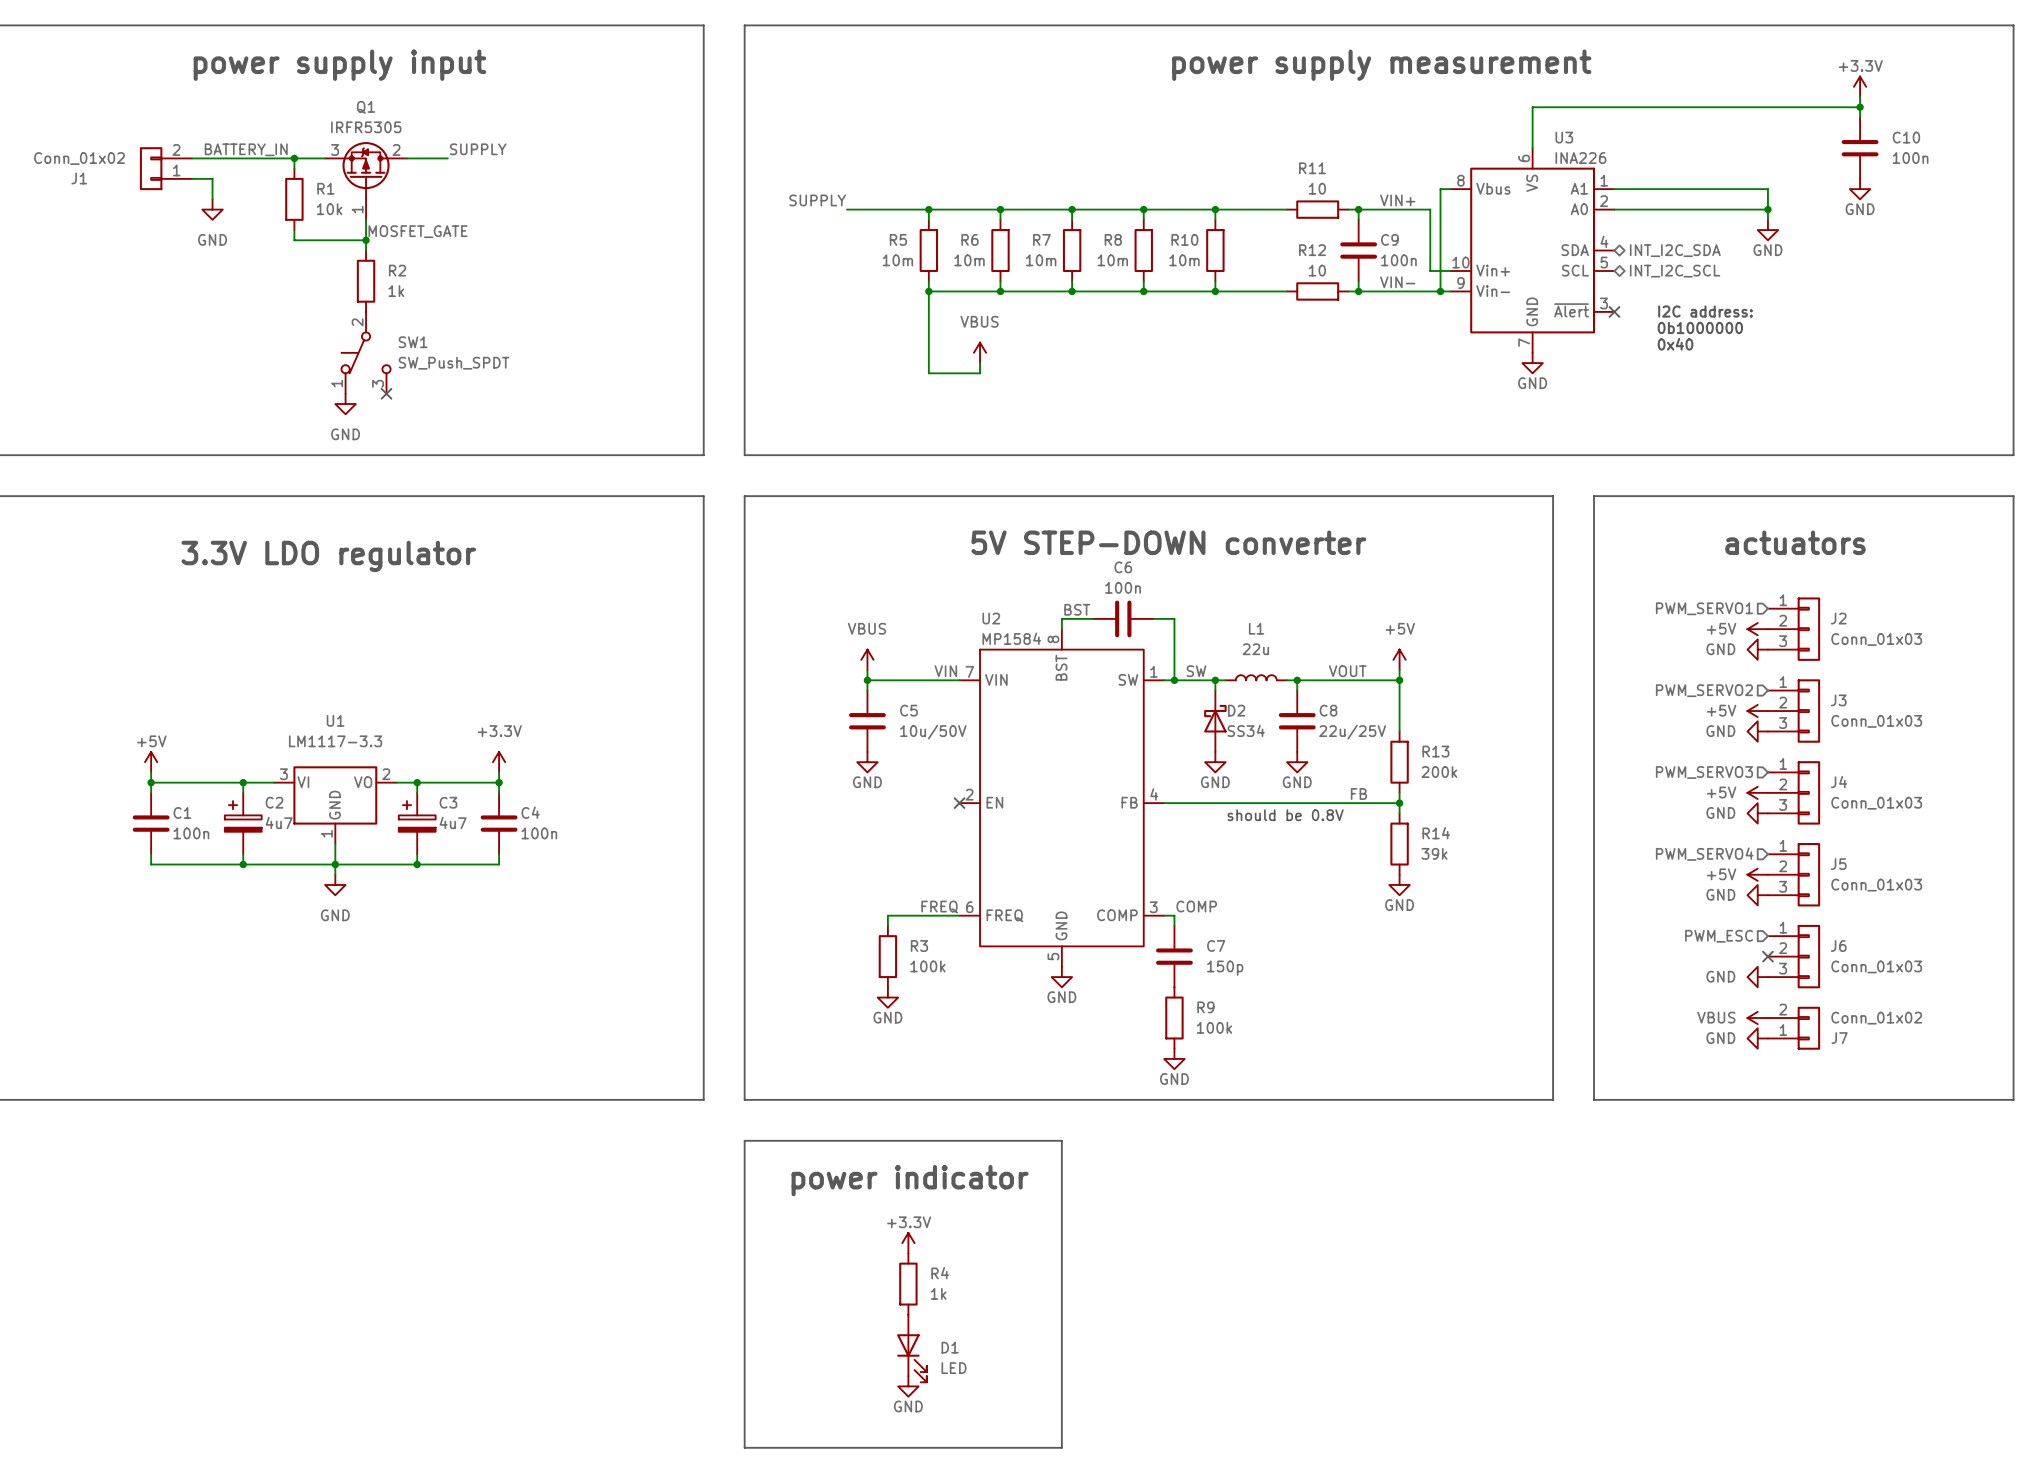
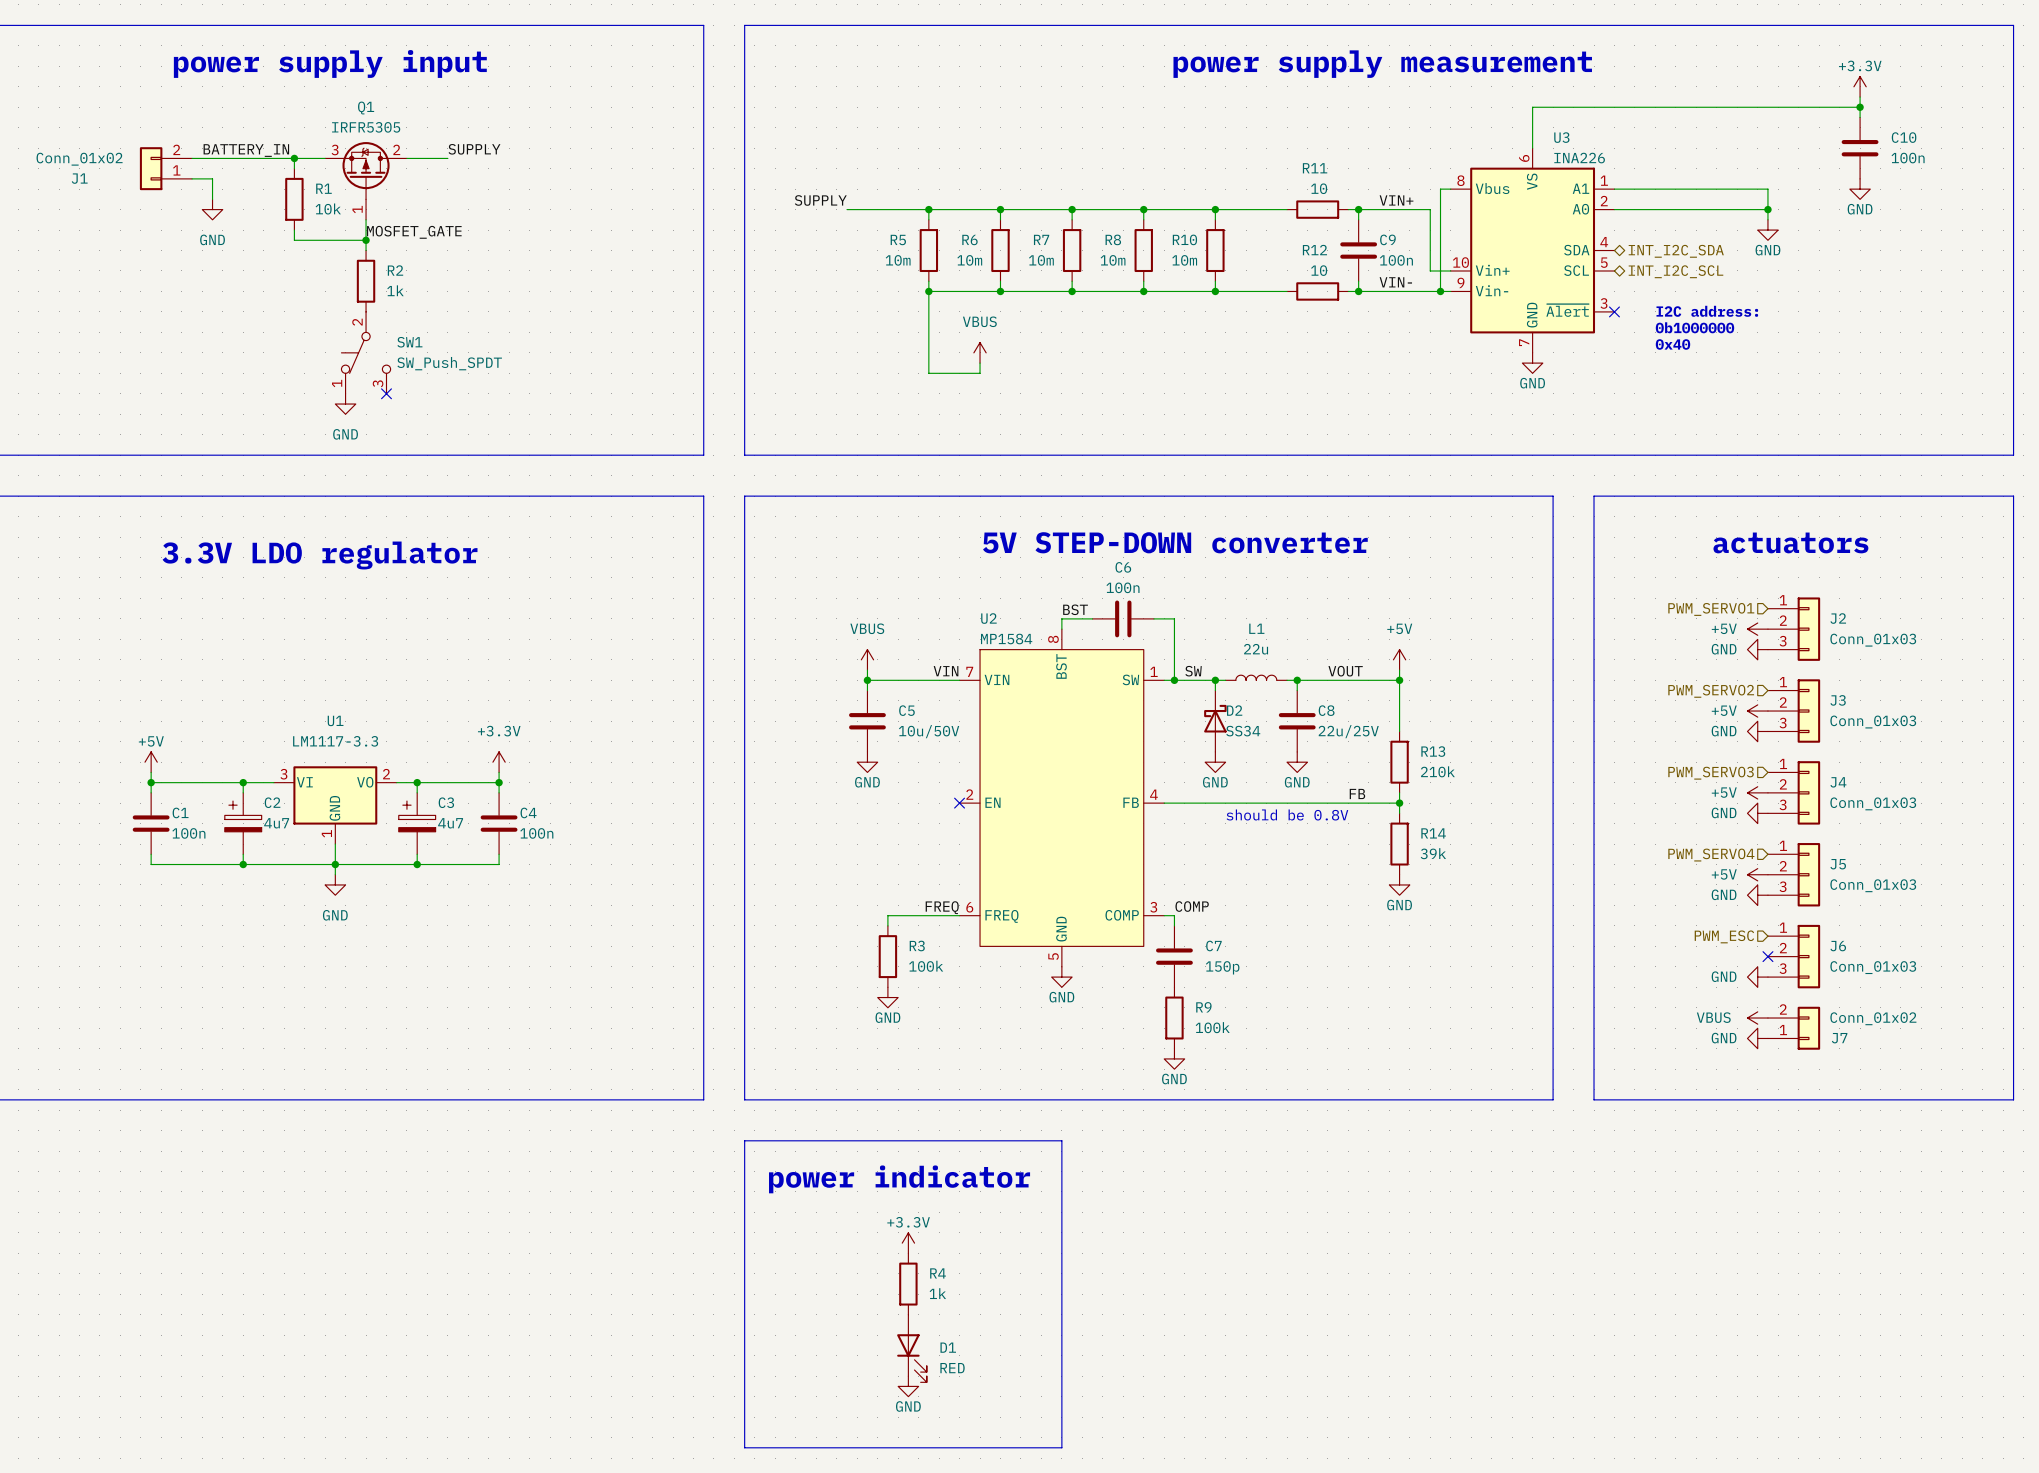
R13 value: 200k (1439, 772) -> 210k (1437, 771)
D1 value: LED (954, 1368) -> RED (952, 1368)

